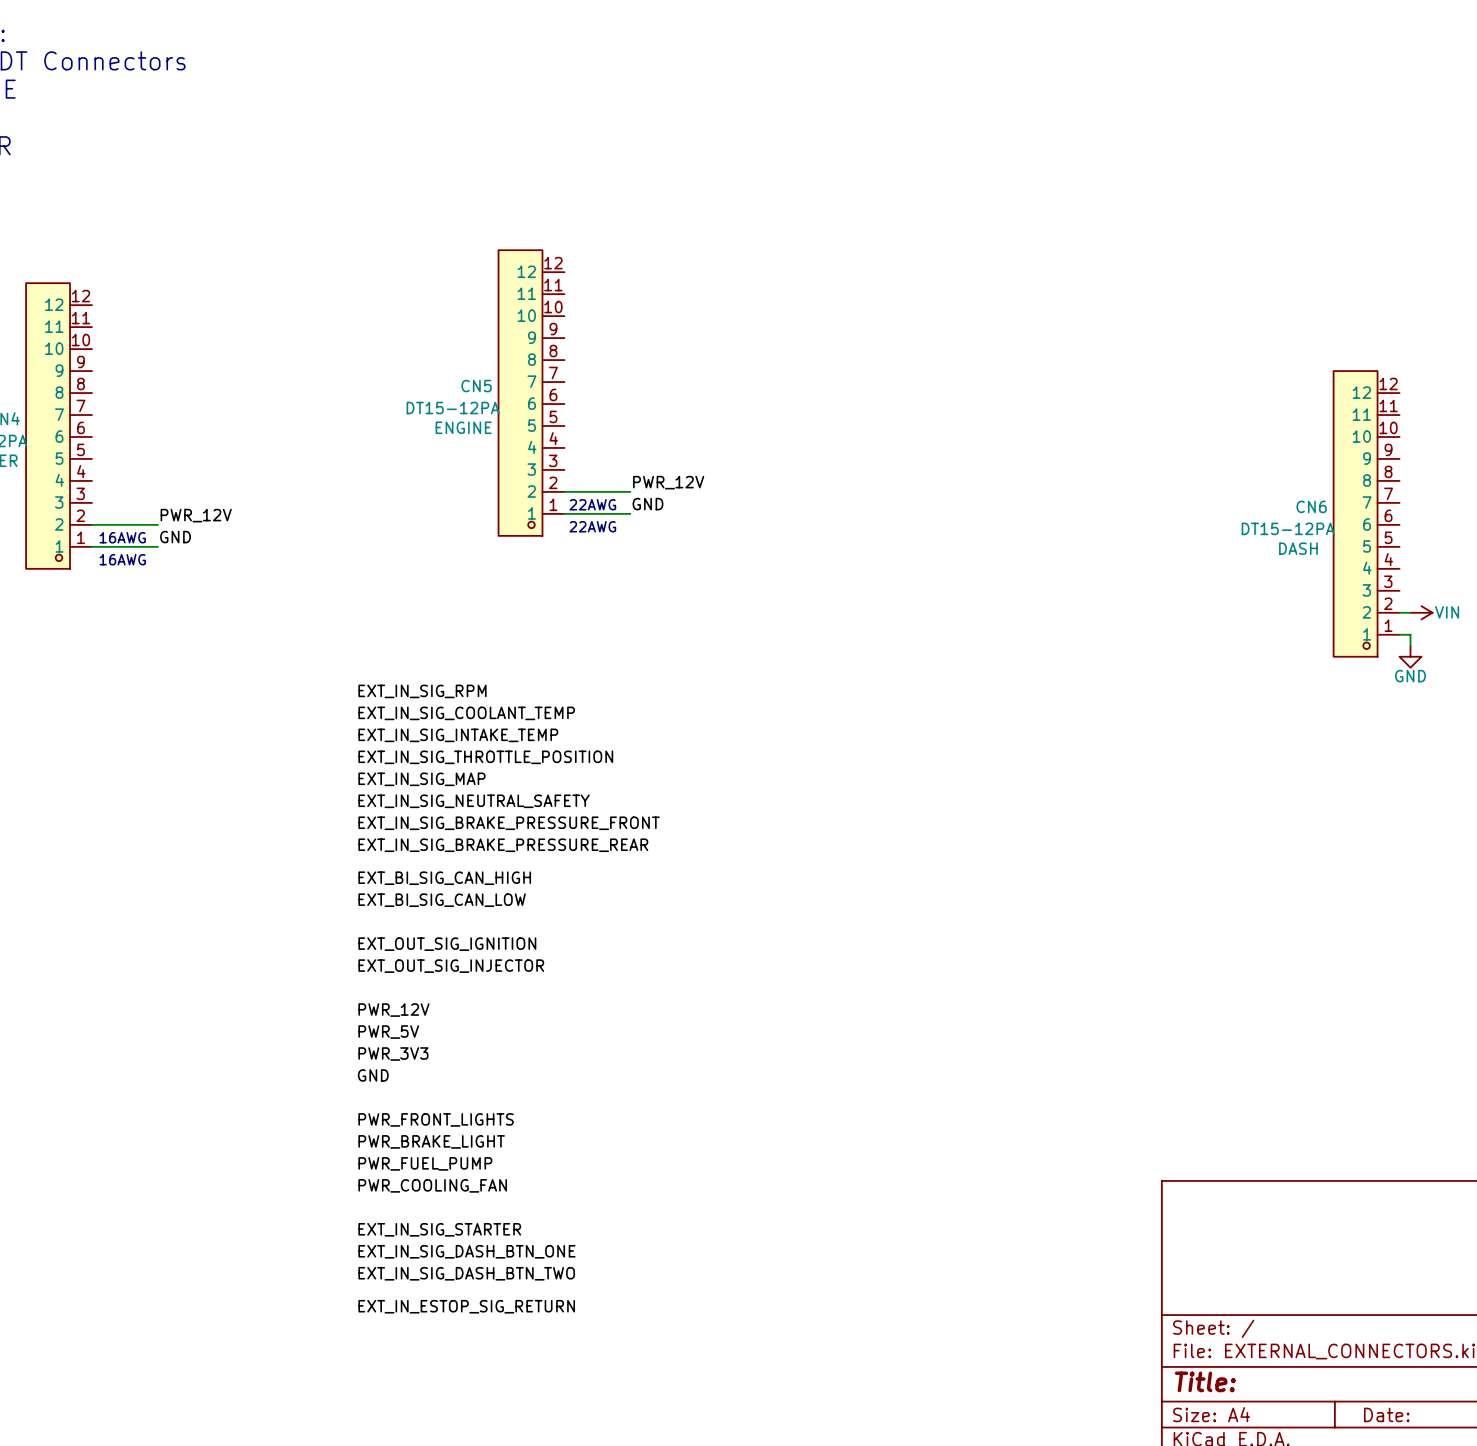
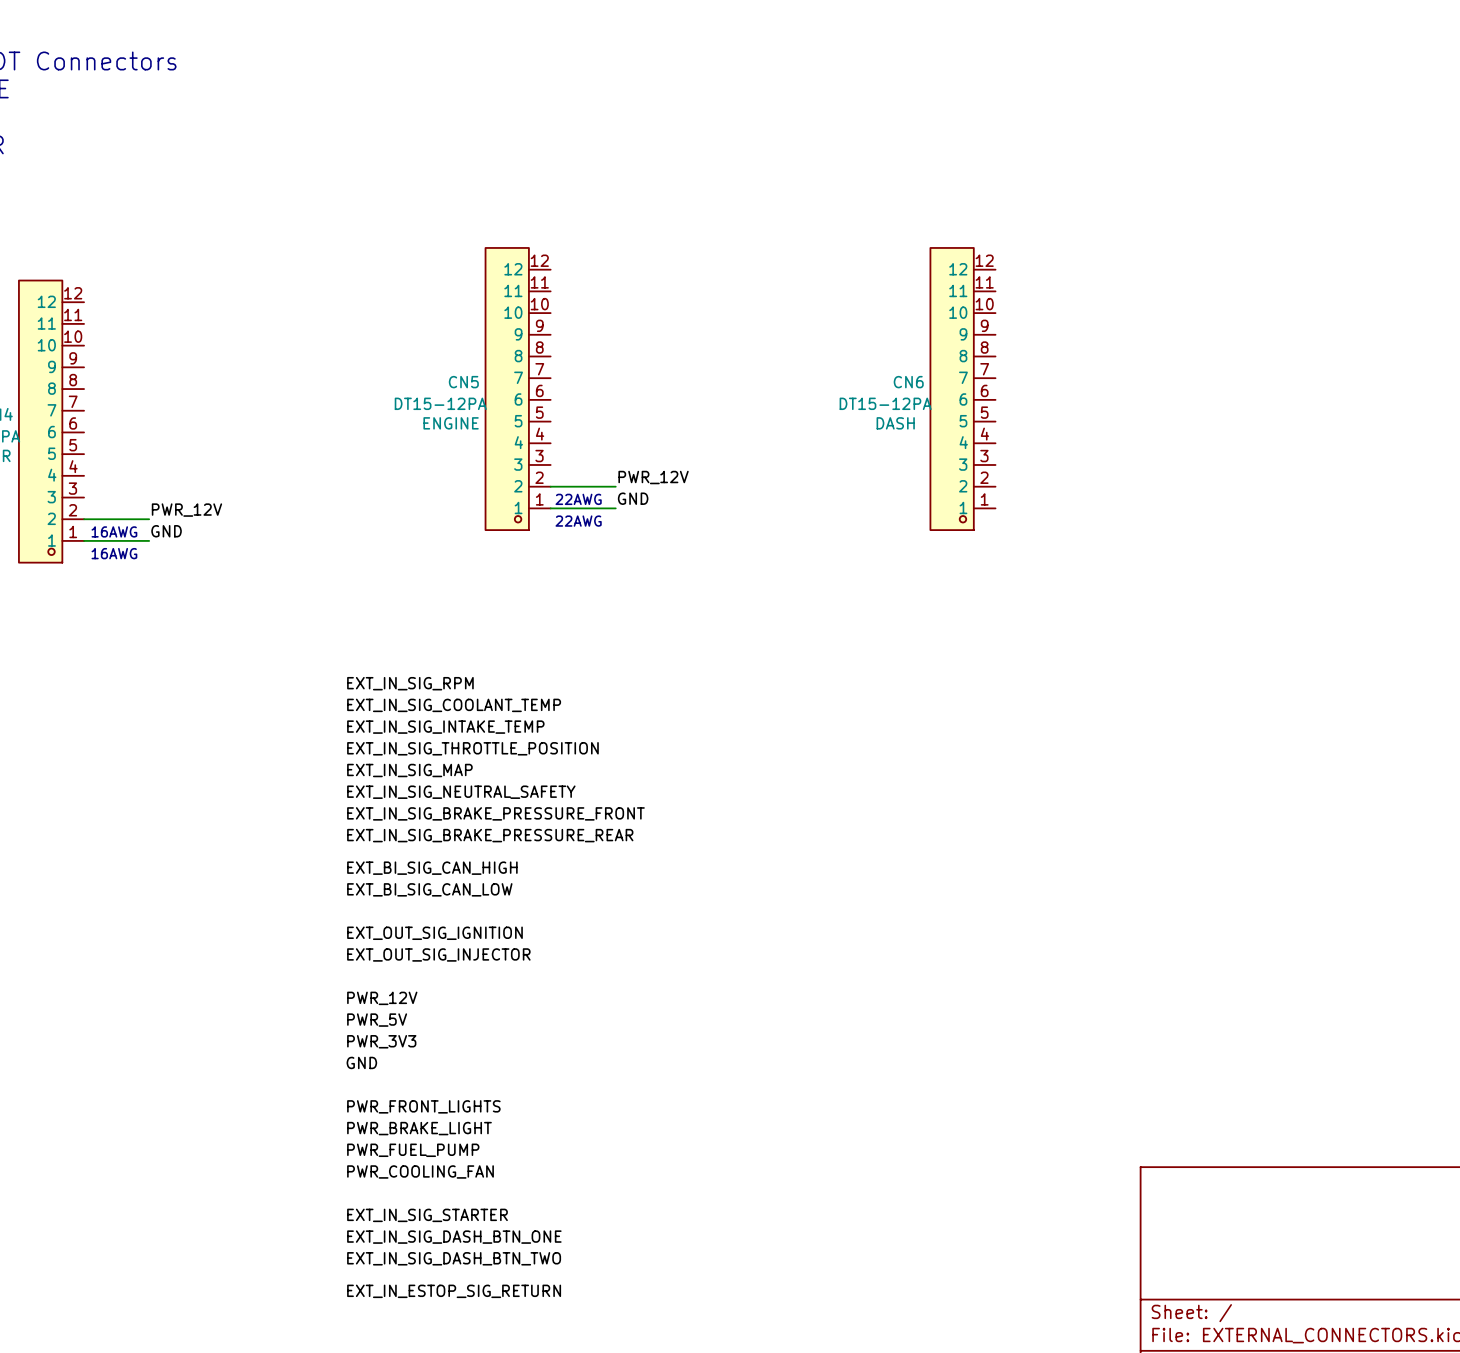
CN6 position: (1366, 513) -> (962, 389)
wire: (1399, 612) (1410, 612) -> none
power symbol: VIN (1421, 612) -> none
wire: (1399, 634) (1410, 634) (1410, 645) -> none
power symbol: GND (1410, 656) -> none

